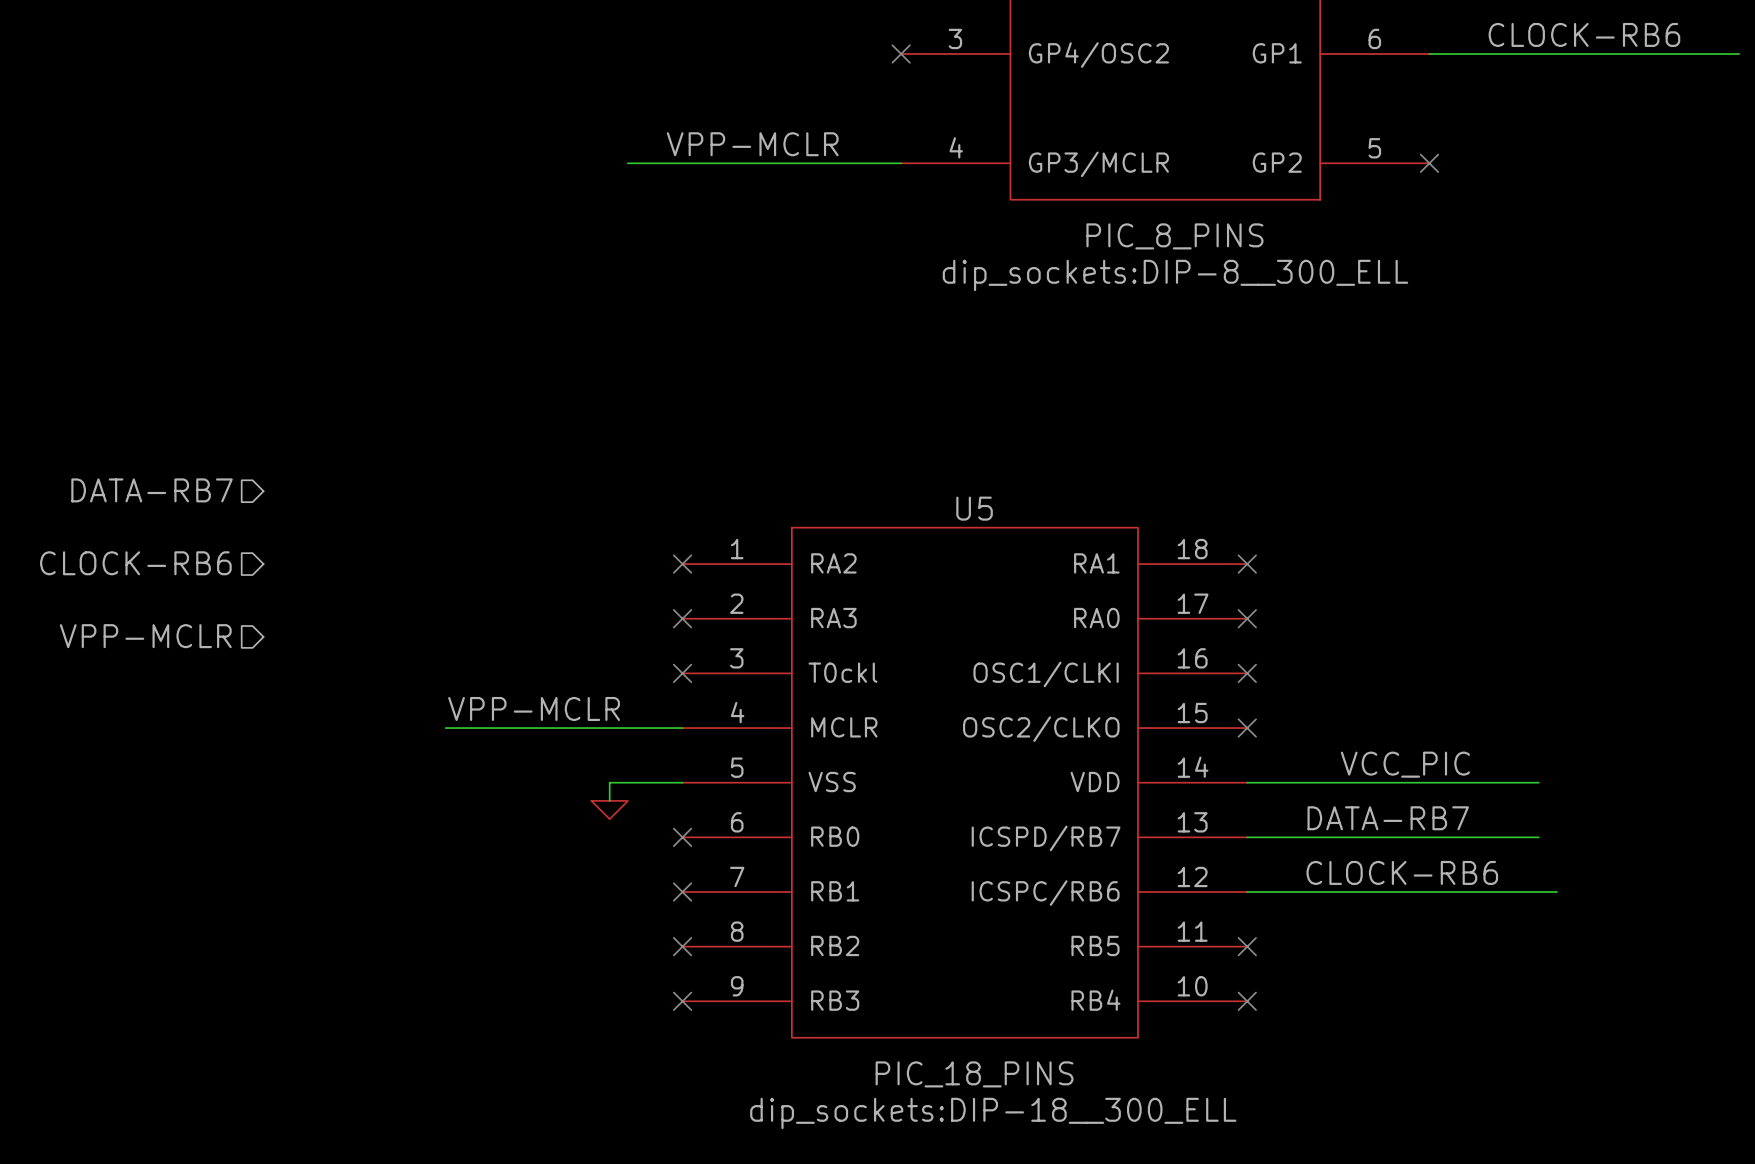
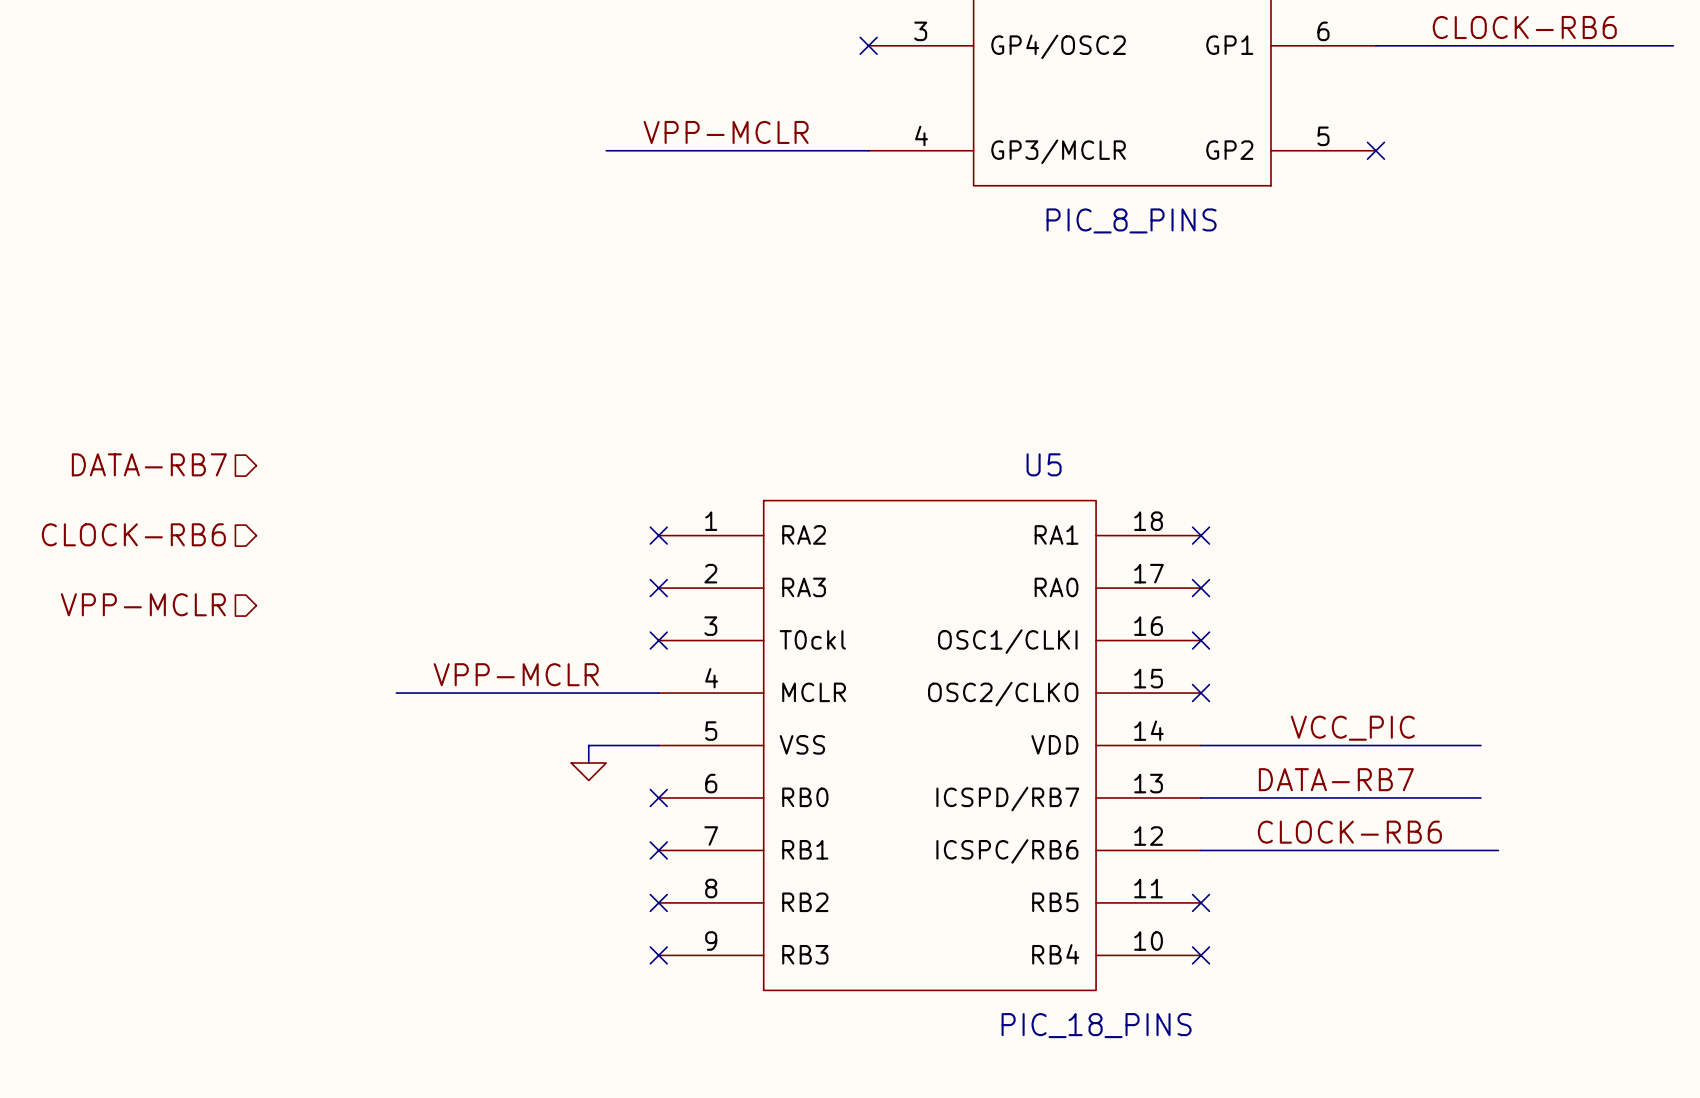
part text: dip_sockets:DIP-8__300_ELL (1175, 275) -> none
U5 name position: U5 (974, 508) -> U5 (1044, 464)
wire: none -> (396, 693) (431, 693)
U5 value position: PIC_18_PINS (974, 1074) -> PIC_18_PINS (1096, 1025)
U5 text: dip_sockets:DIP-18__300_ELL (993, 1113) -> none

